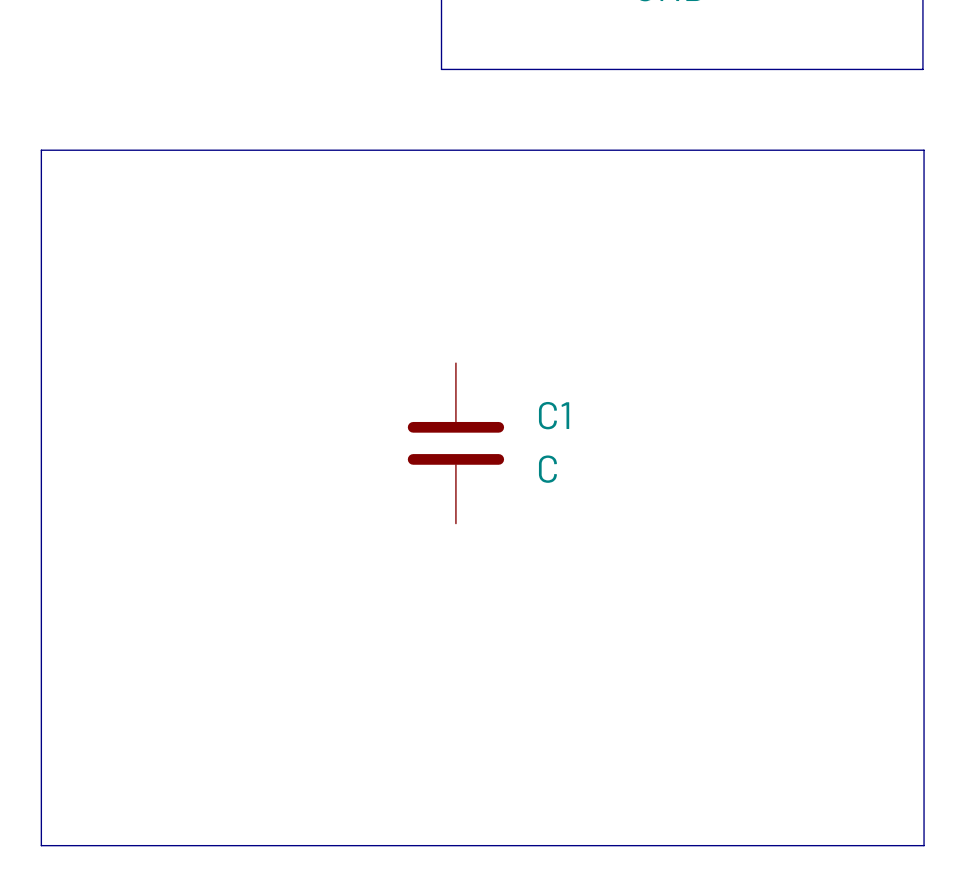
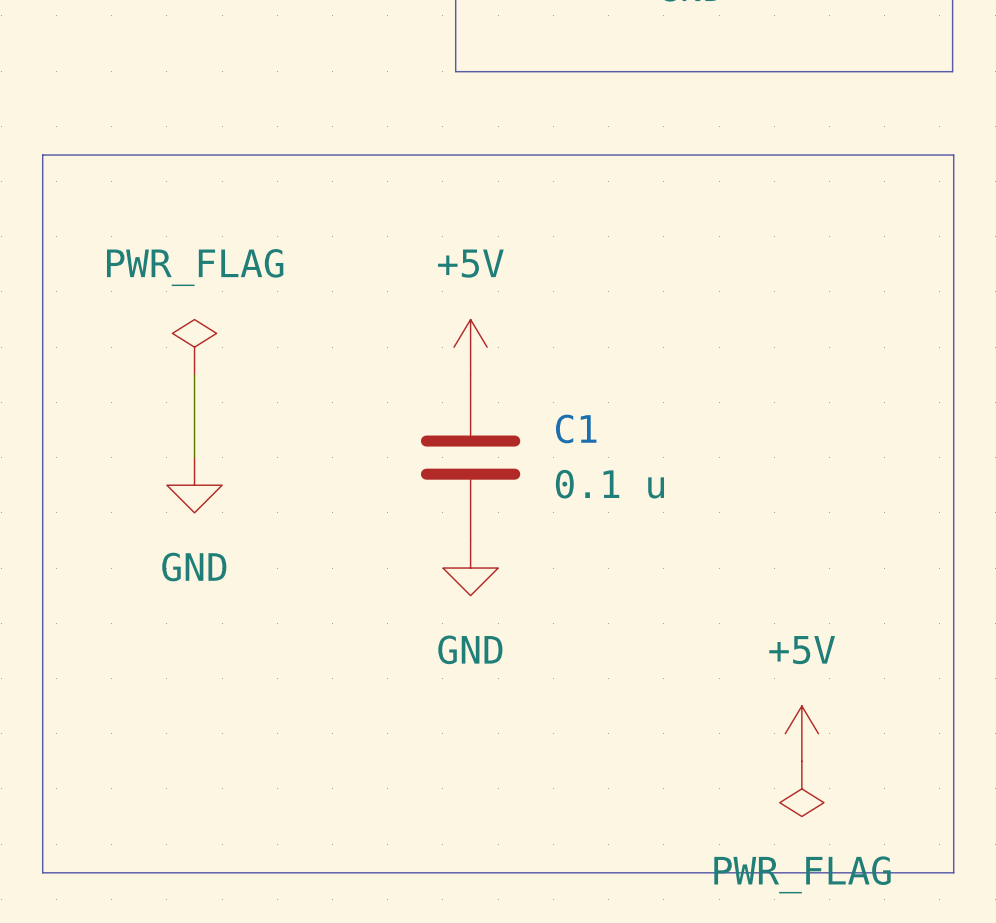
power symbol: none -> PWR_FLAG (194, 347)
power symbol: none -> +5V (470, 347)
wire: none -> (194, 374) (194, 457)
C1 value: C (547, 469) -> 0.1 u (609, 484)
power symbol: none -> GND (194, 485)
power symbol: none -> GND (470, 568)
power symbol: none -> +5V (801, 733)
power symbol: none -> PWR_FLAG (801, 788)

